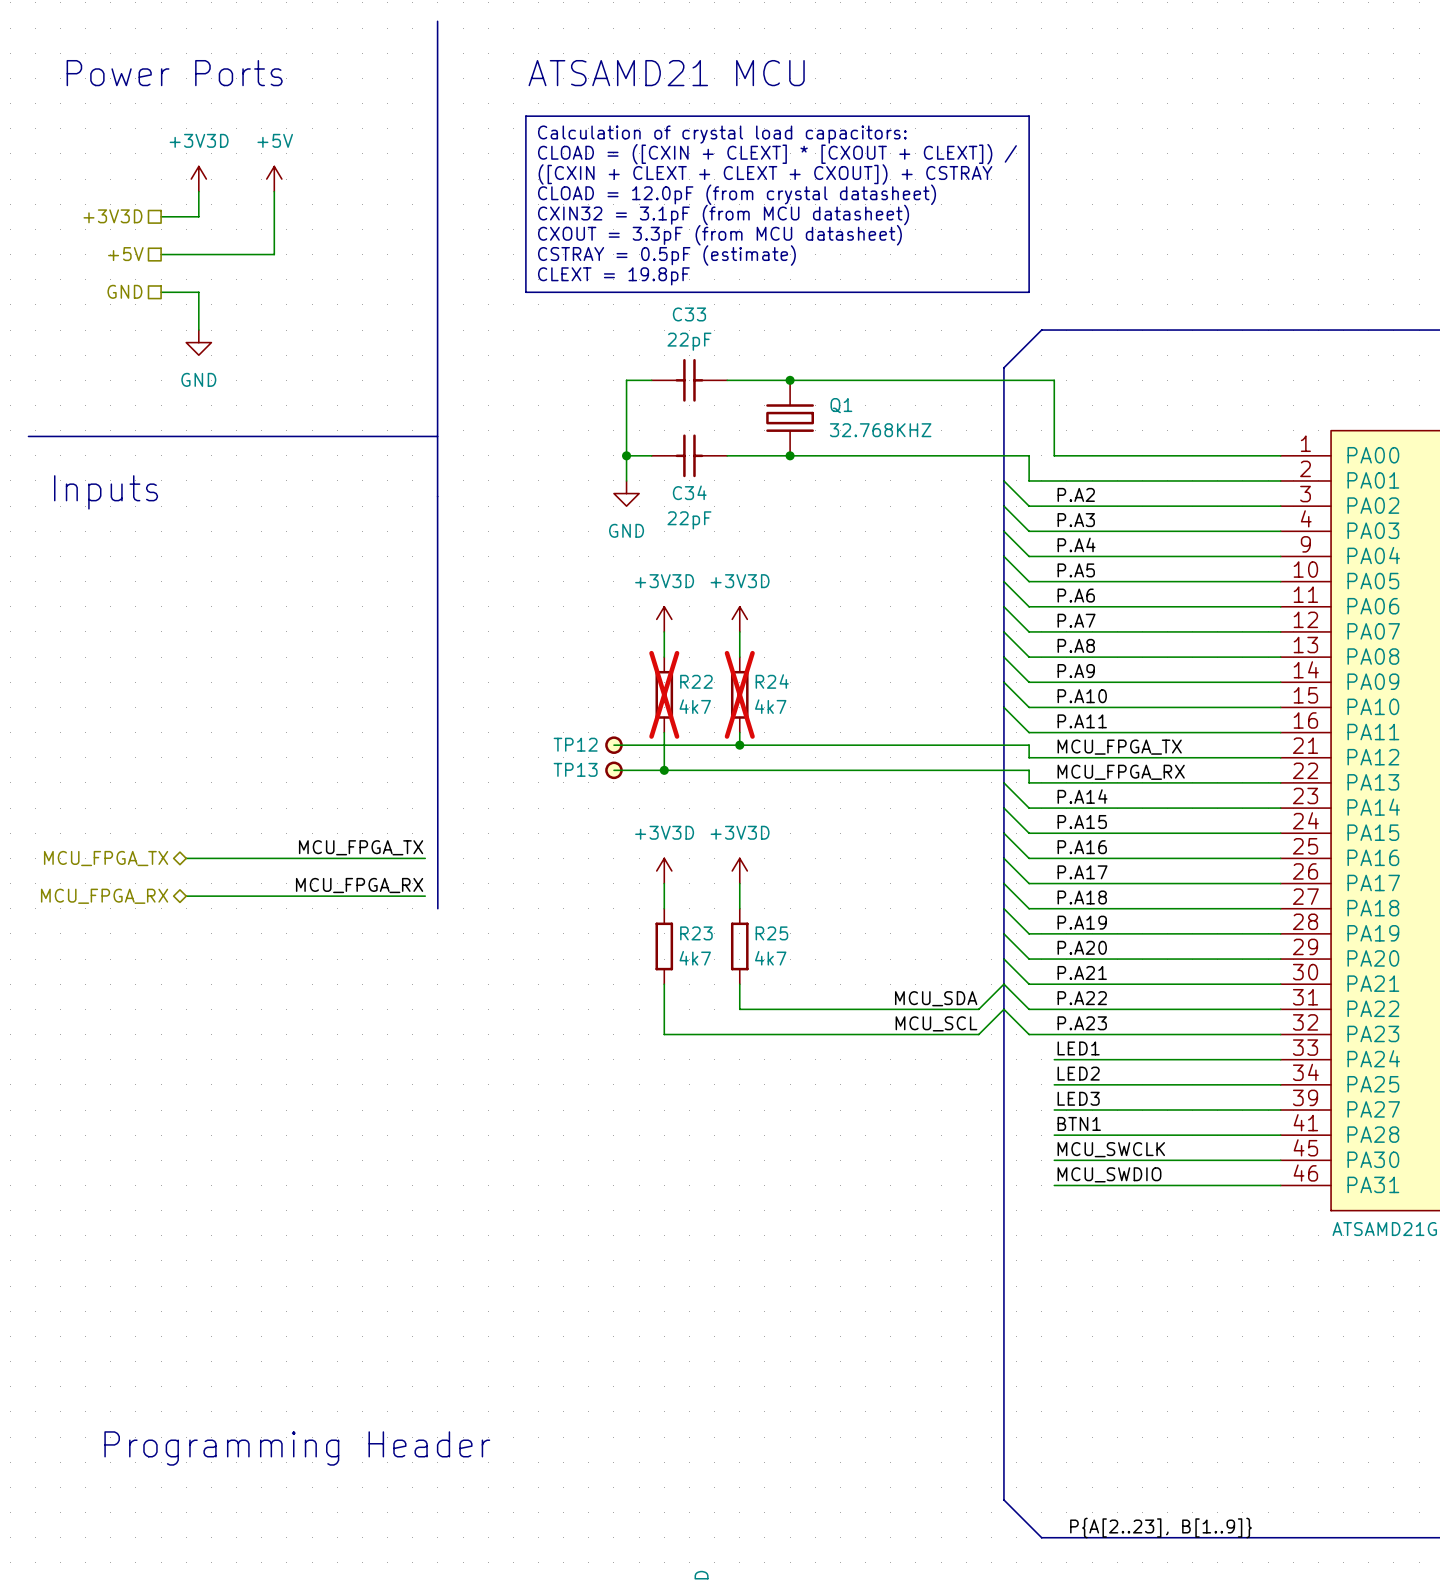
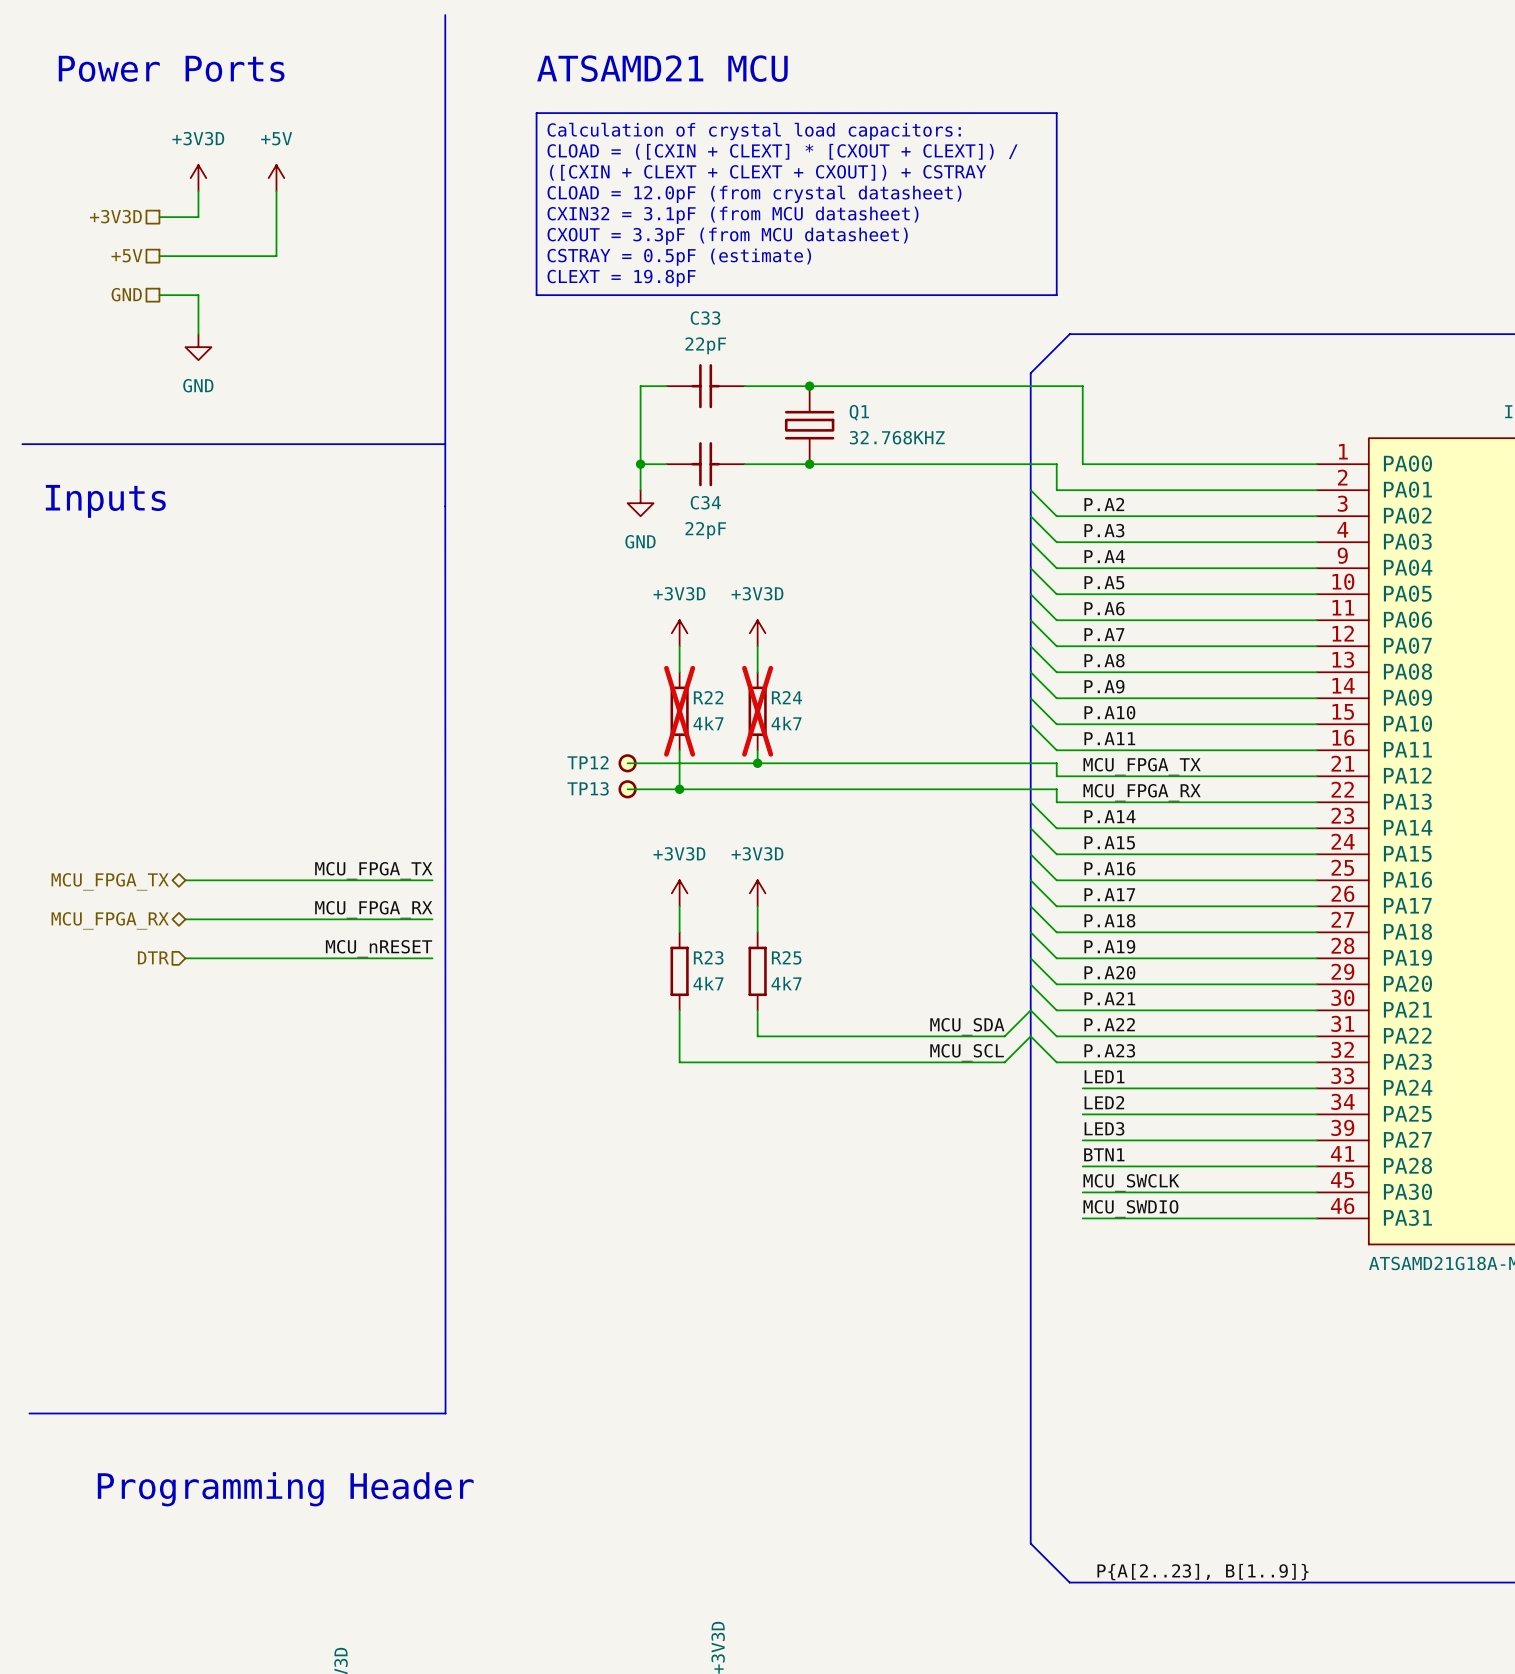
line: (437, 496) (437, 908) -> (445, 506) (445, 1413) (29, 1413)
label: none -> MCU_nRESET (379, 948)
hierarchical label: none -> DTR (153, 957)
wire: none -> (185, 958) (432, 958)

